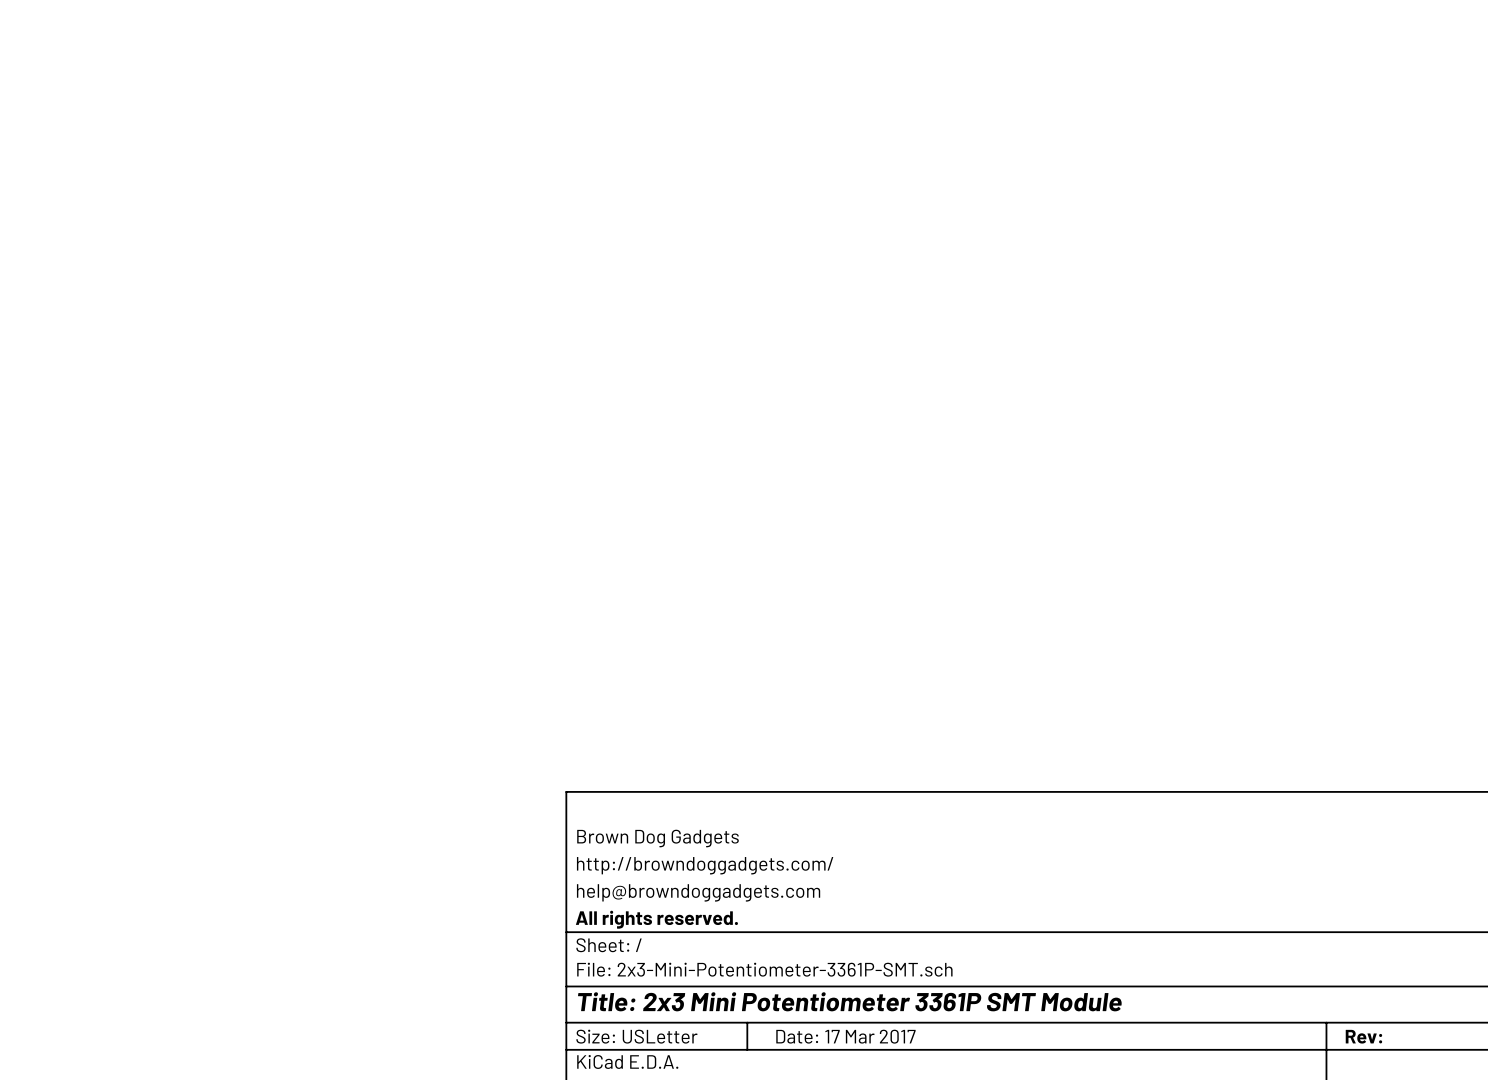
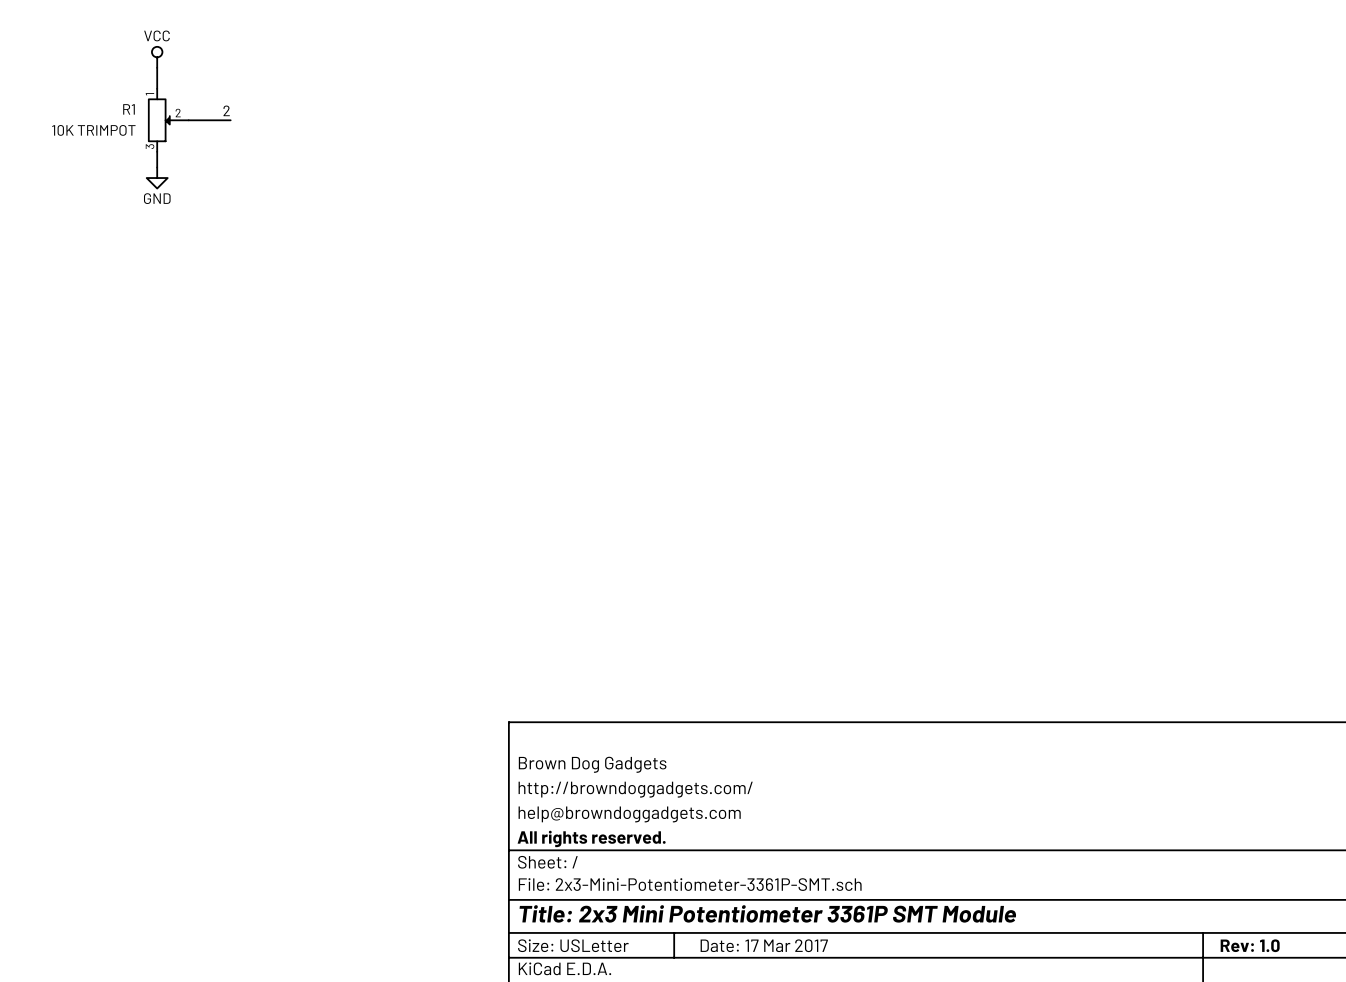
power symbol: none -> VCC (157, 57)
wire: none -> (157, 67) (157, 88)
label: none -> 2 (226, 110)
R1: none -> 10K TRIMPOT (168, 120)
wire: none -> (188, 120) (230, 120)
wire: none -> (157, 151) (157, 167)
power symbol: none -> GND (157, 178)
title block: Rev: (1363, 1036) -> Rev: 1.0 (1250, 945)

